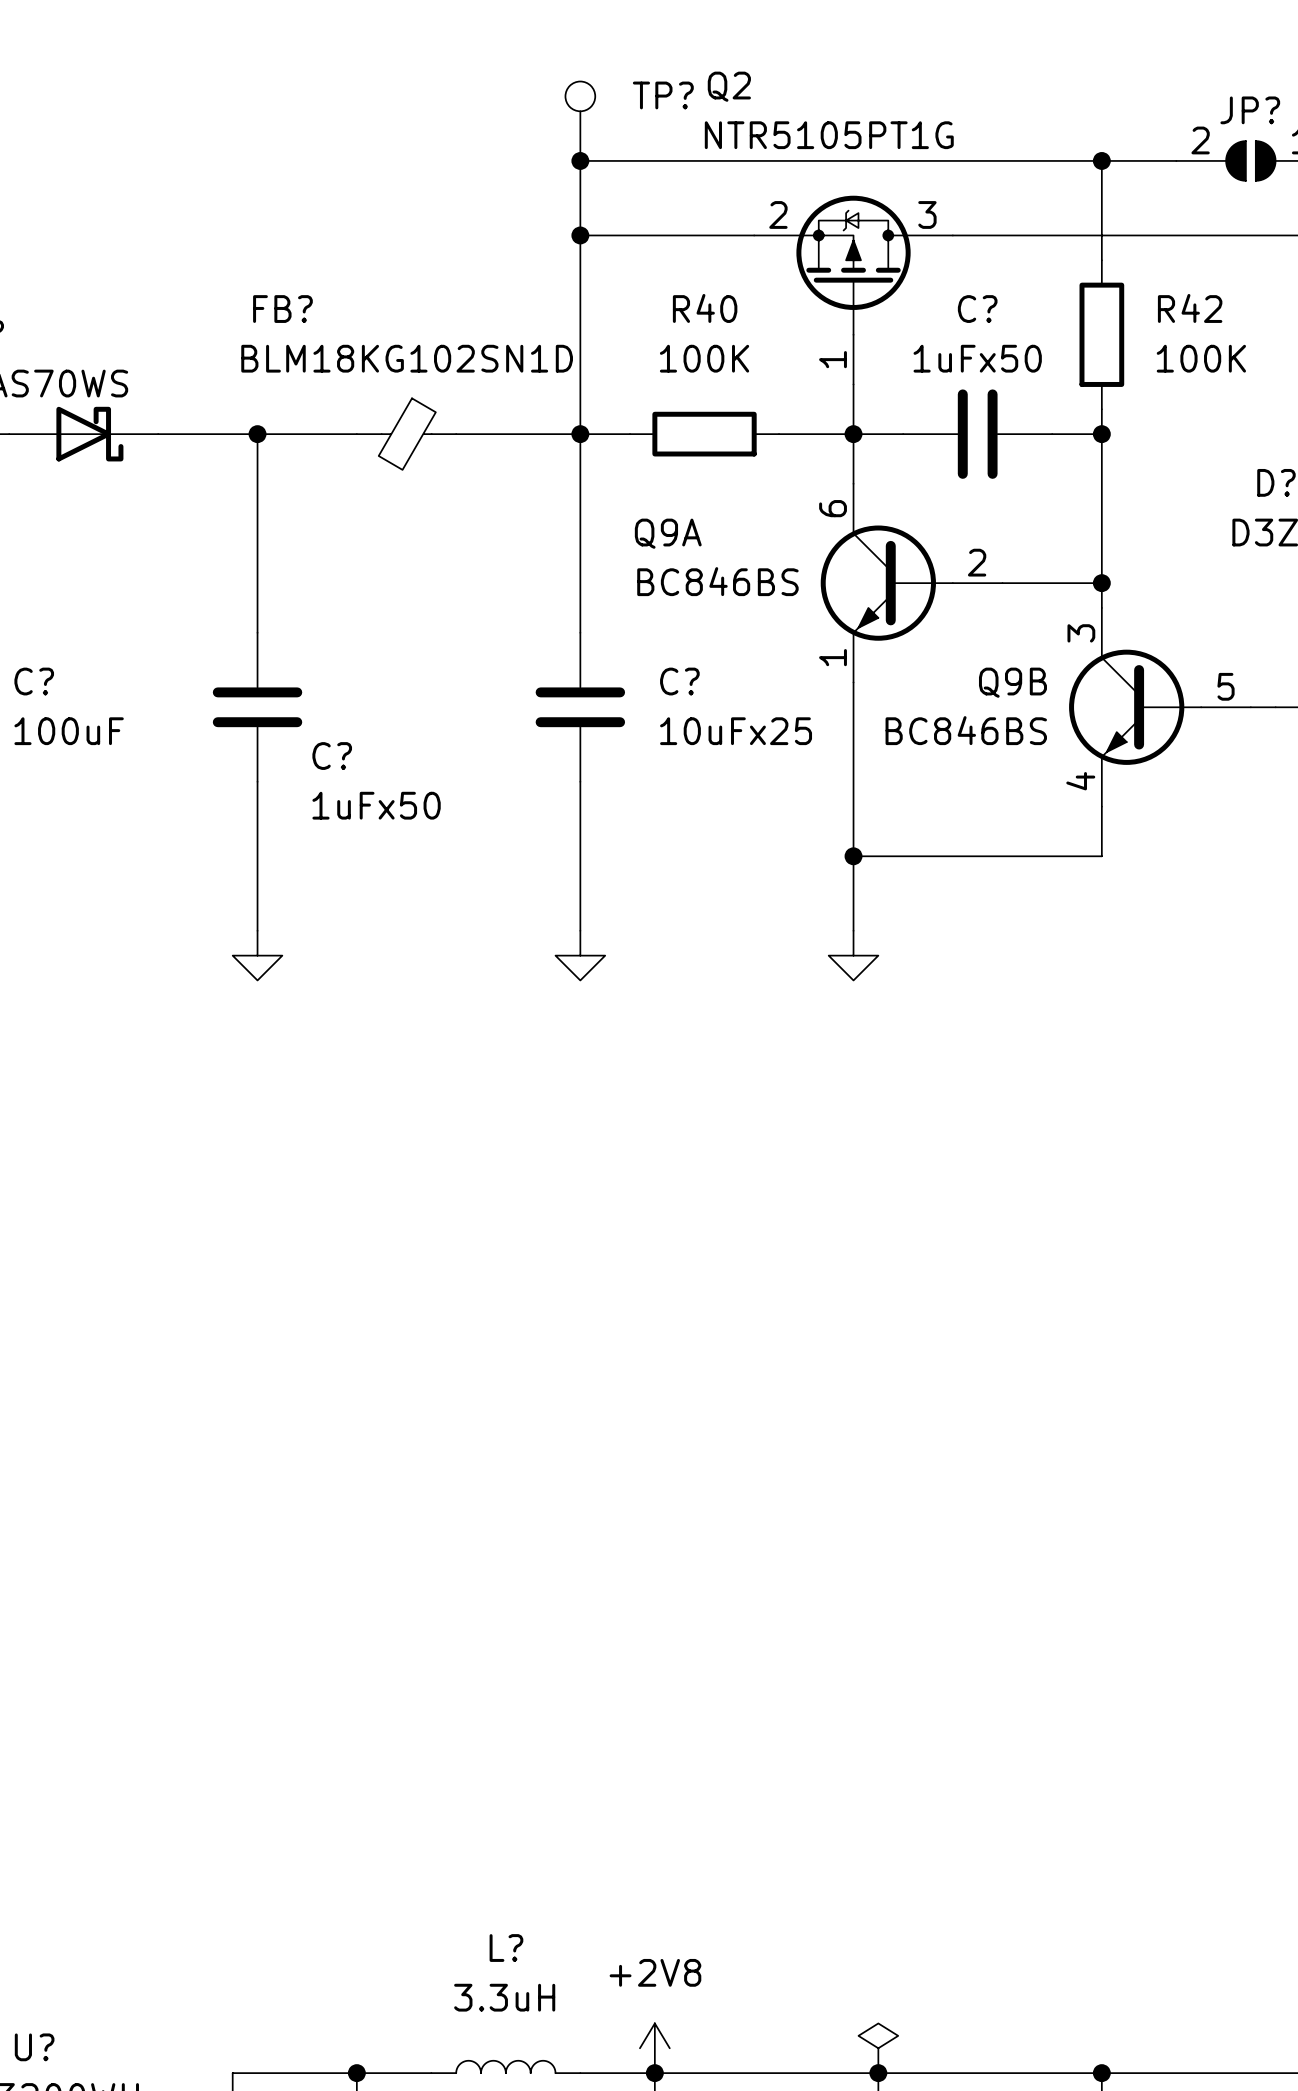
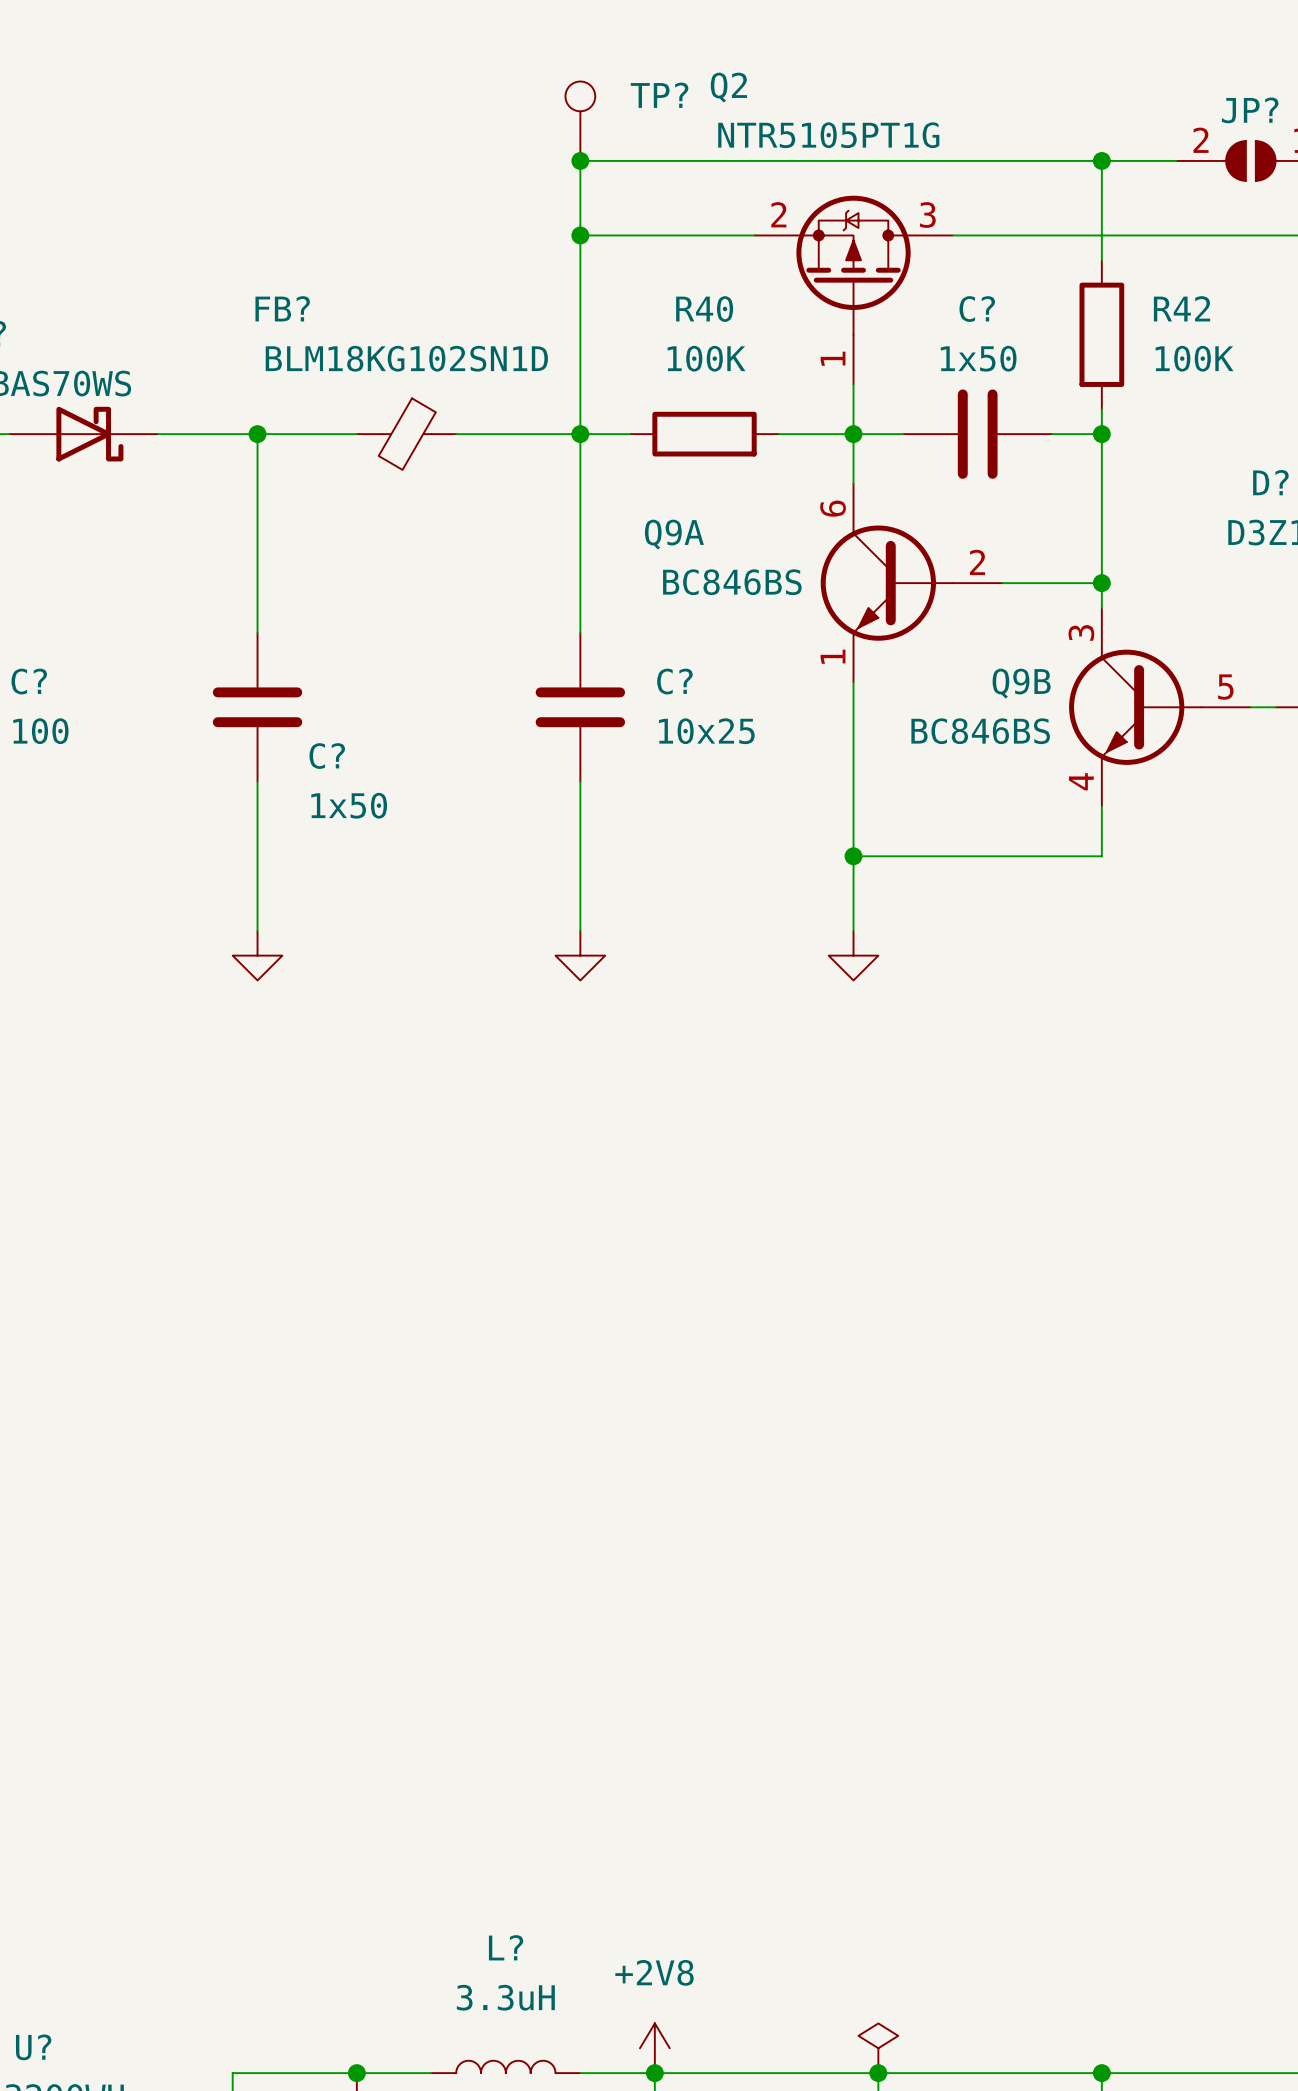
C? value: 1uFx50 (977, 358) -> 1x50 (978, 358)
C? value: 100uF (69, 731) -> 100 (40, 731)
C? value: 10uFx25 (736, 731) -> 10x25 (706, 731)
C? value: 1uFx50 (376, 805) -> 1x50 (349, 805)

